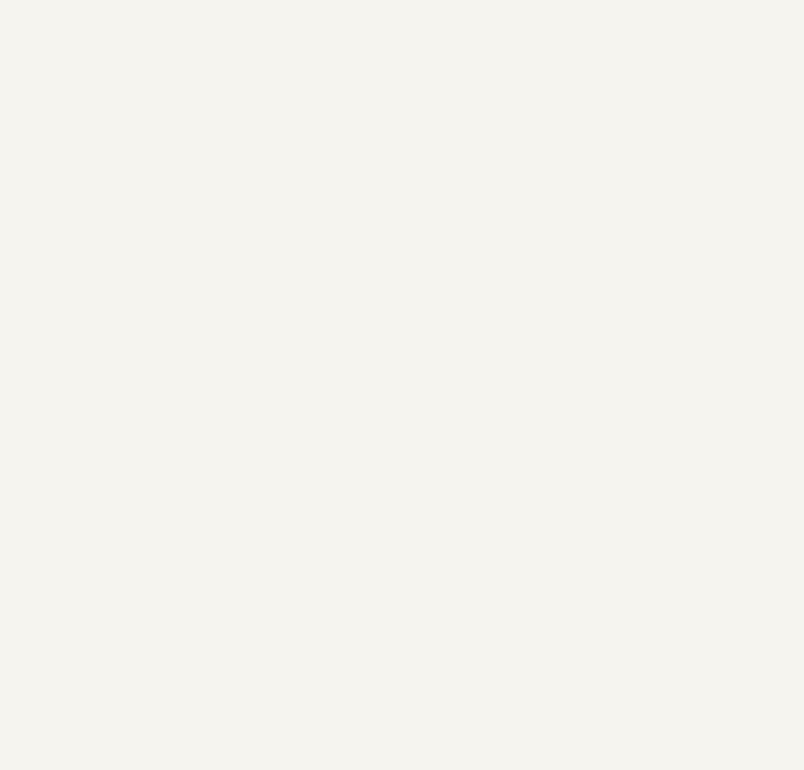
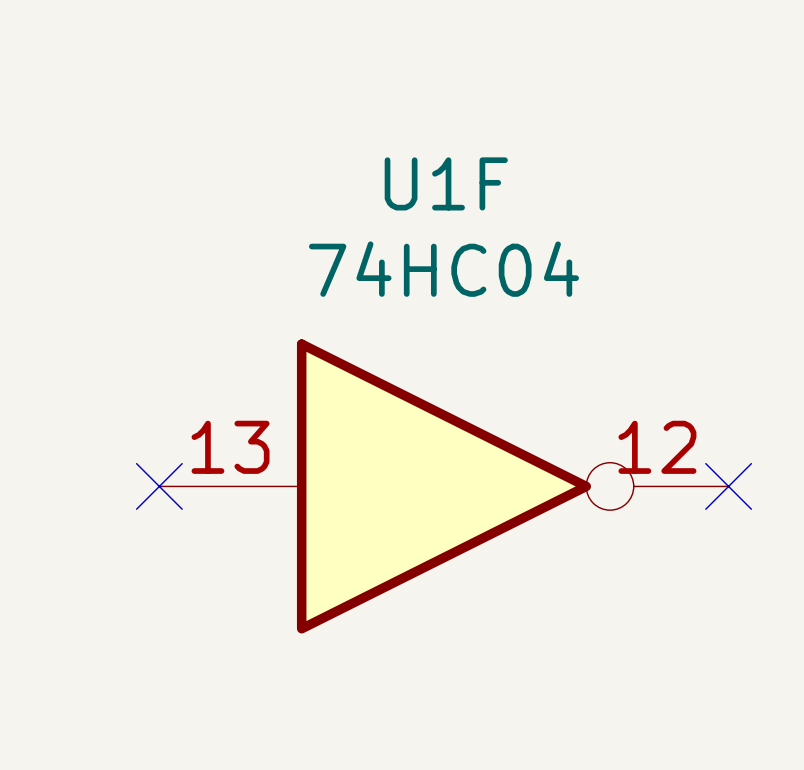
no-connect mark: none -> (159, 486)
U1F: none -> 74HC04 (443, 486)
no-connect mark: none -> (728, 486)

